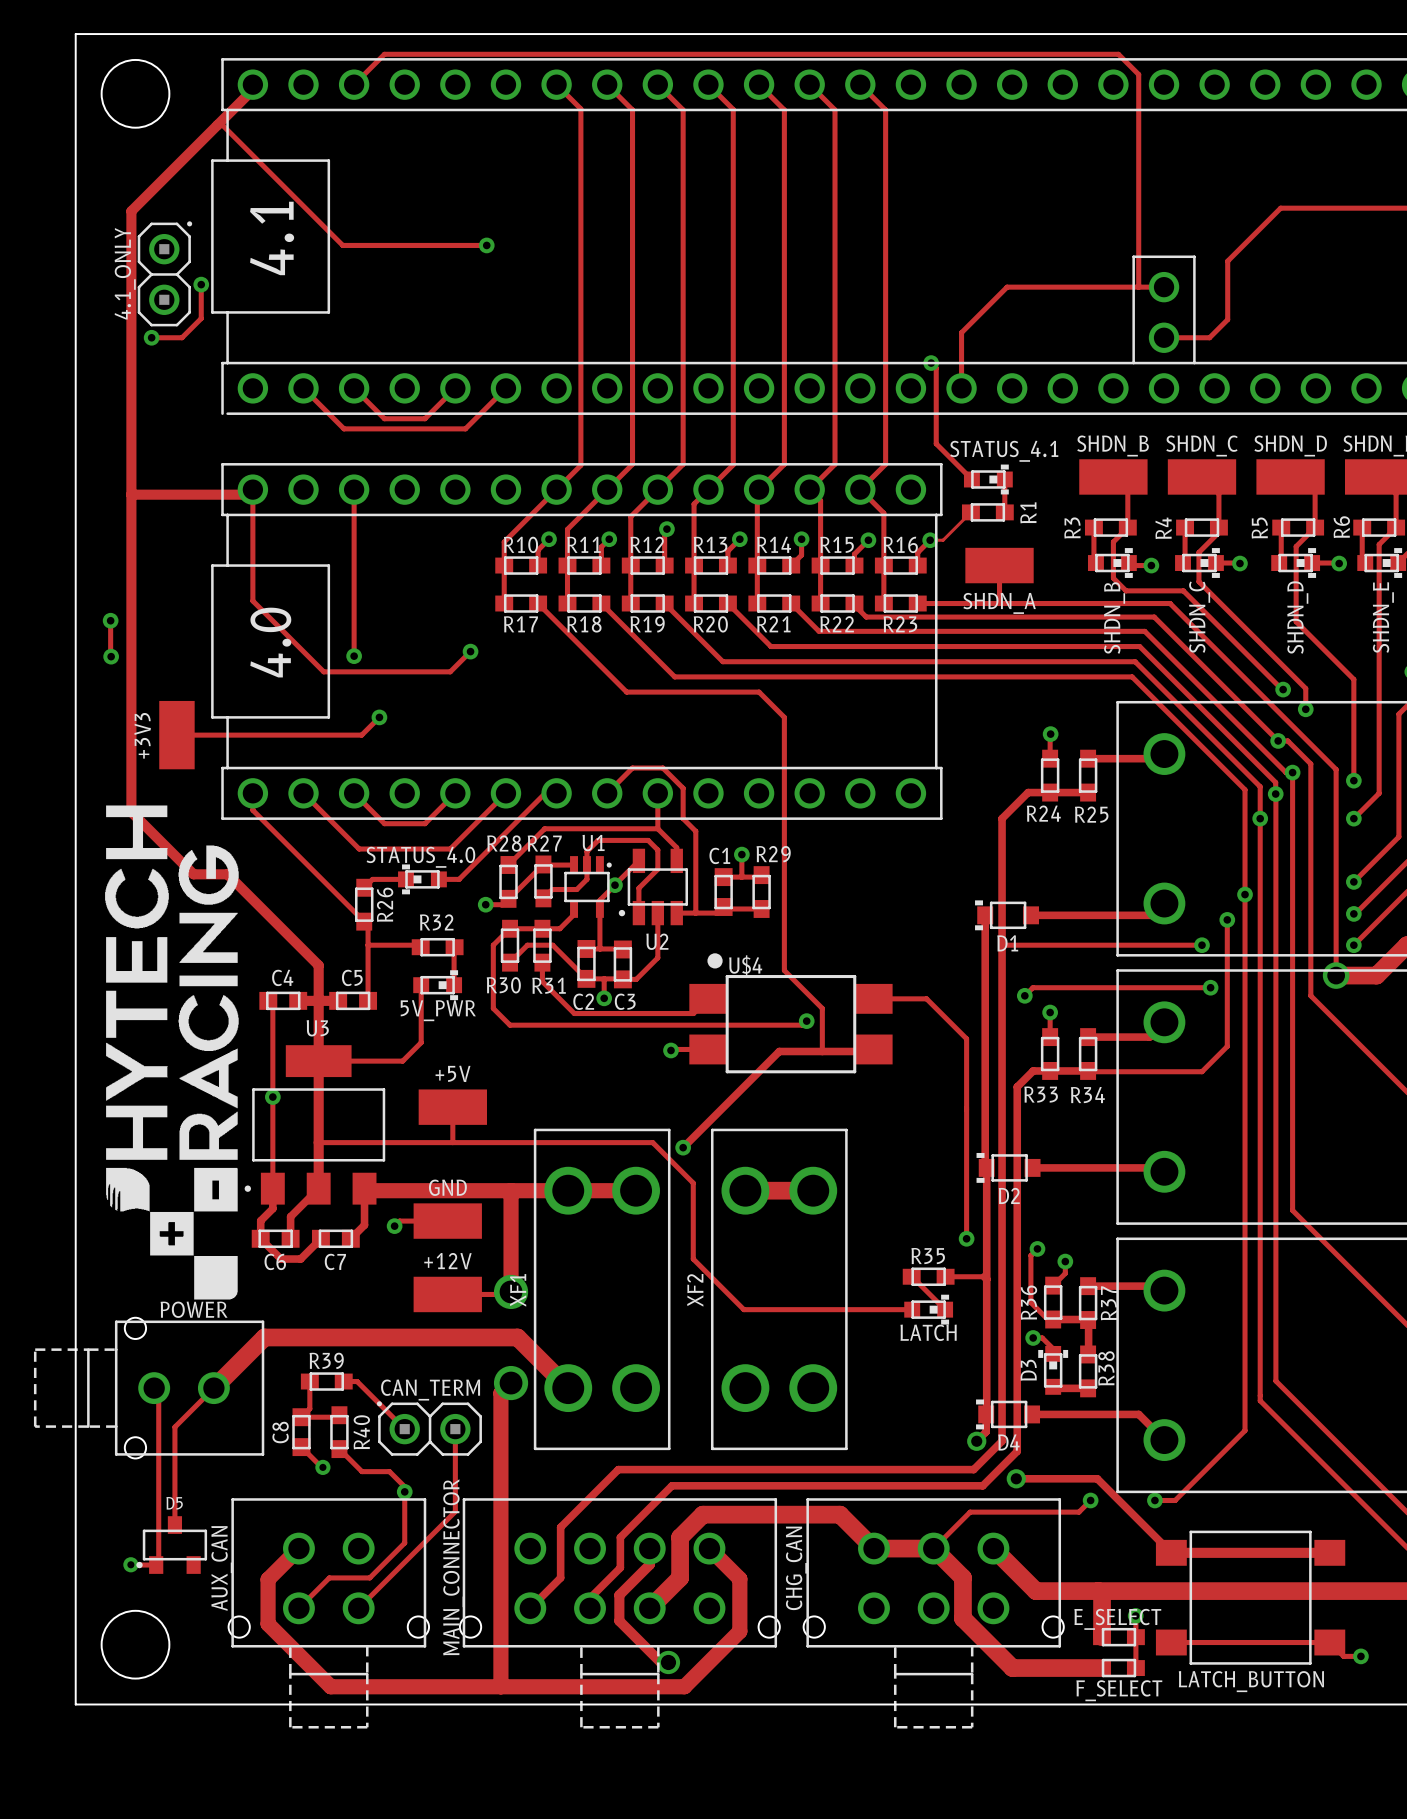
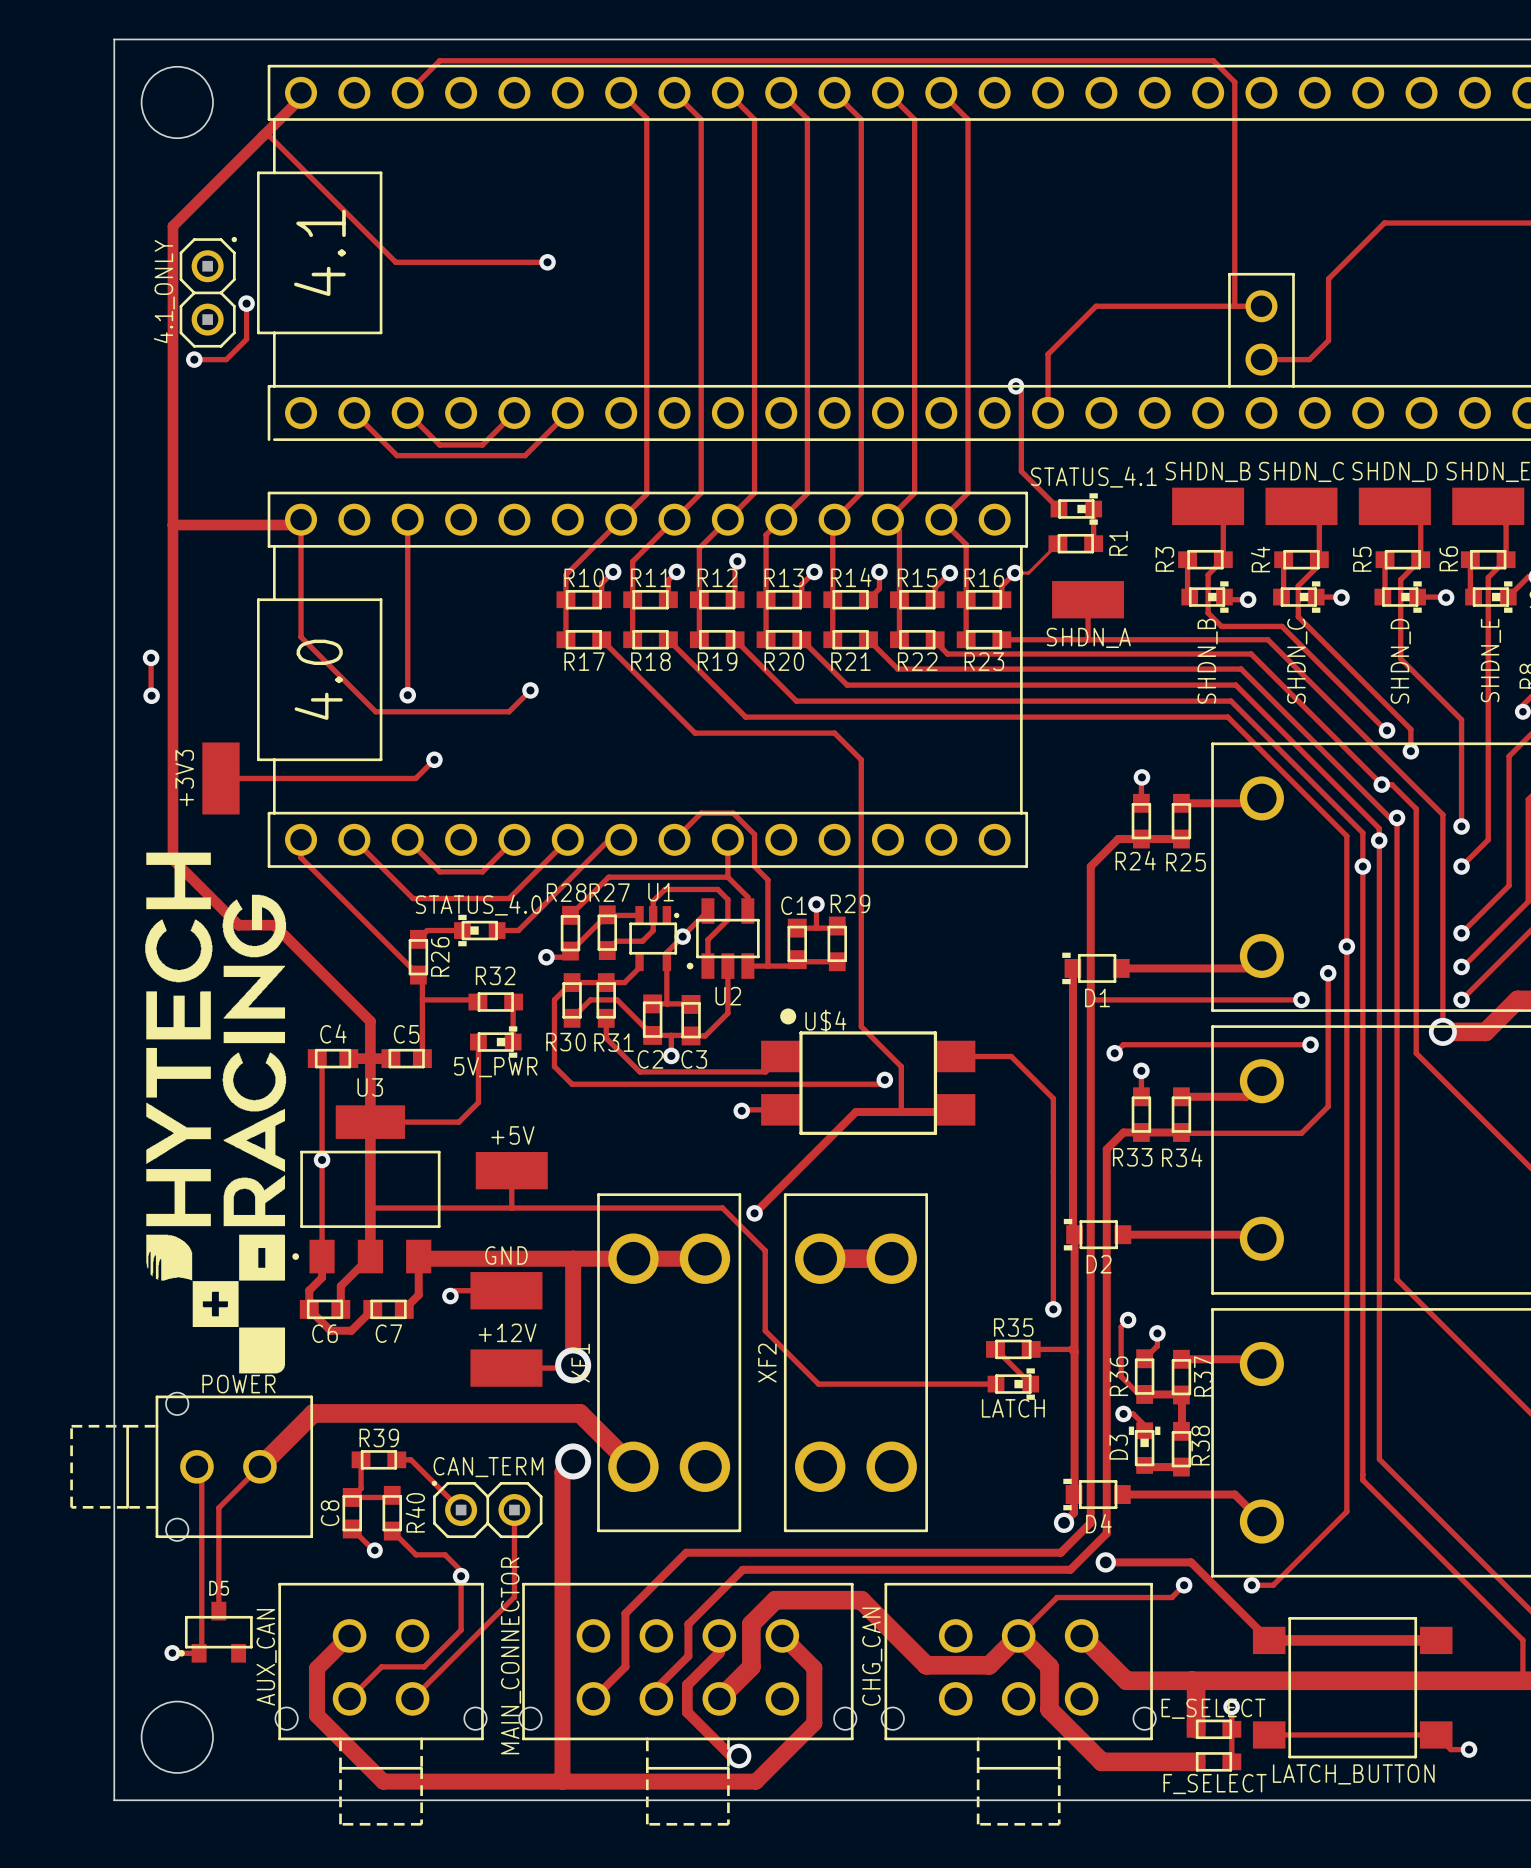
track: (784, 1514) (840, 1514) (873, 1548) (933, 1548) -> (861, 1600) (926, 1665) (989, 1665) (1018, 1635)

